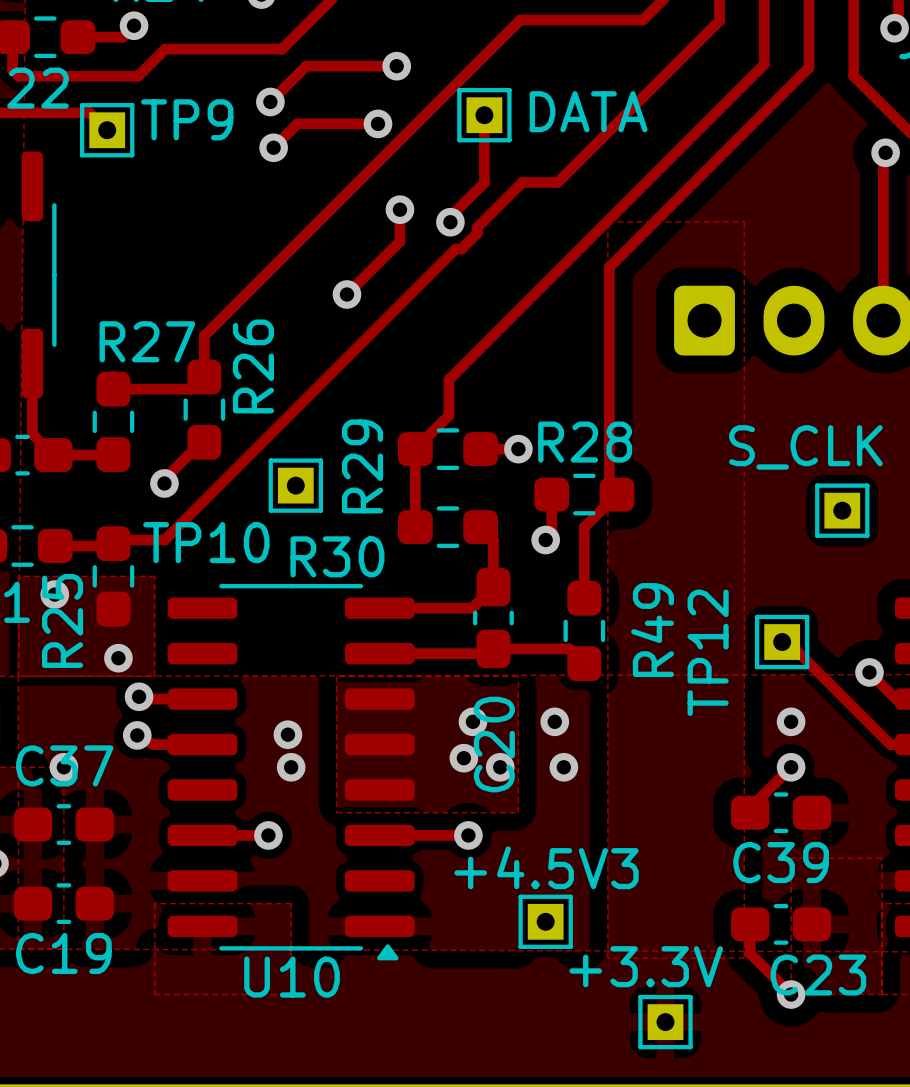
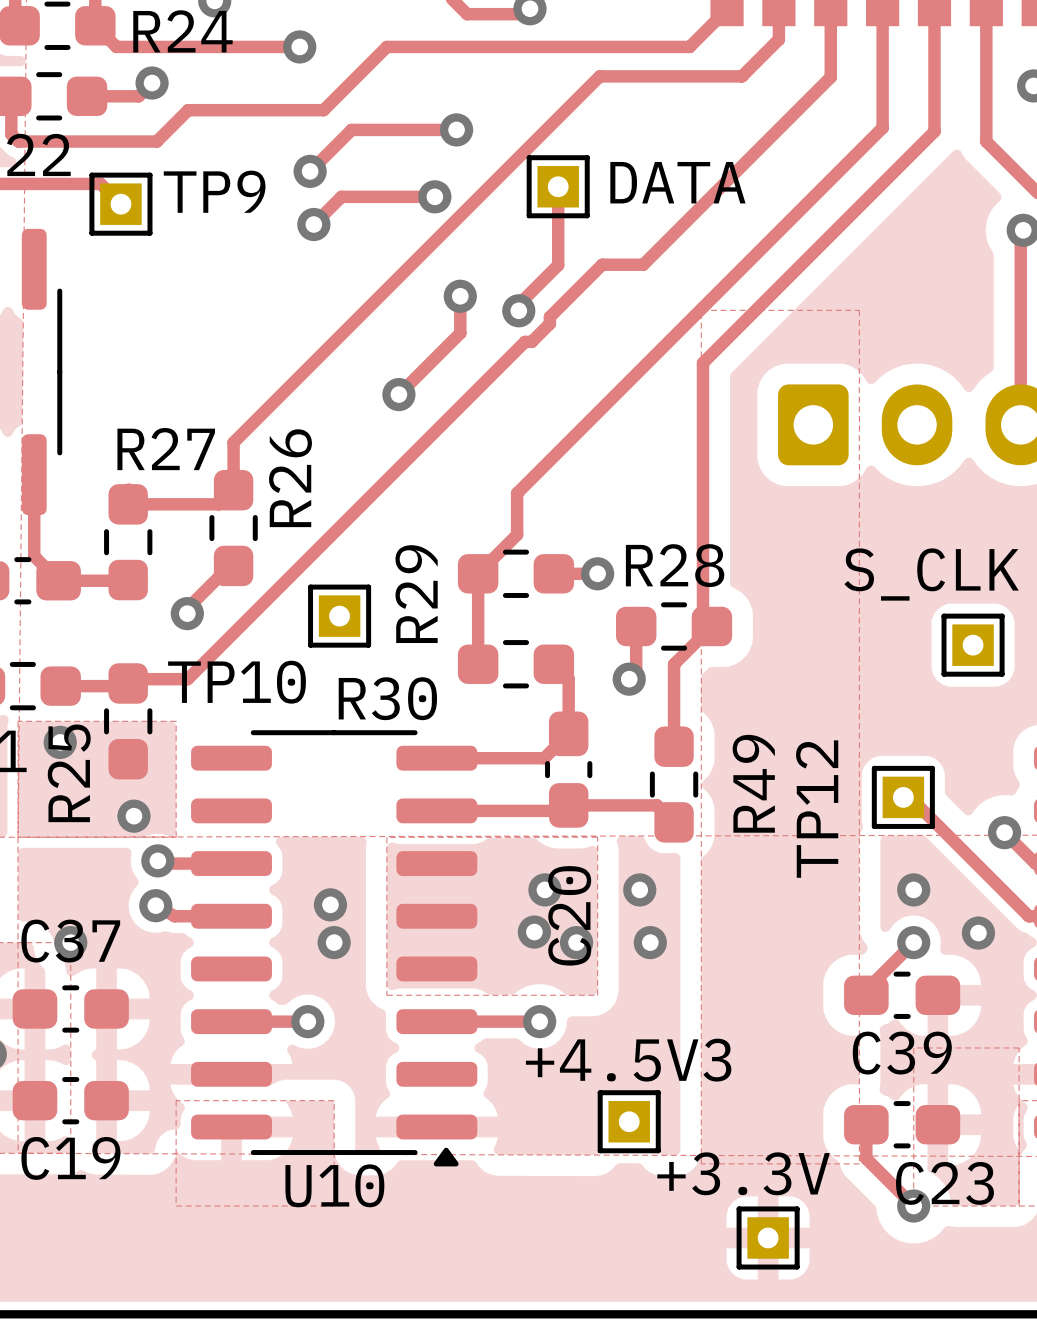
via: none -> (978, 933)

